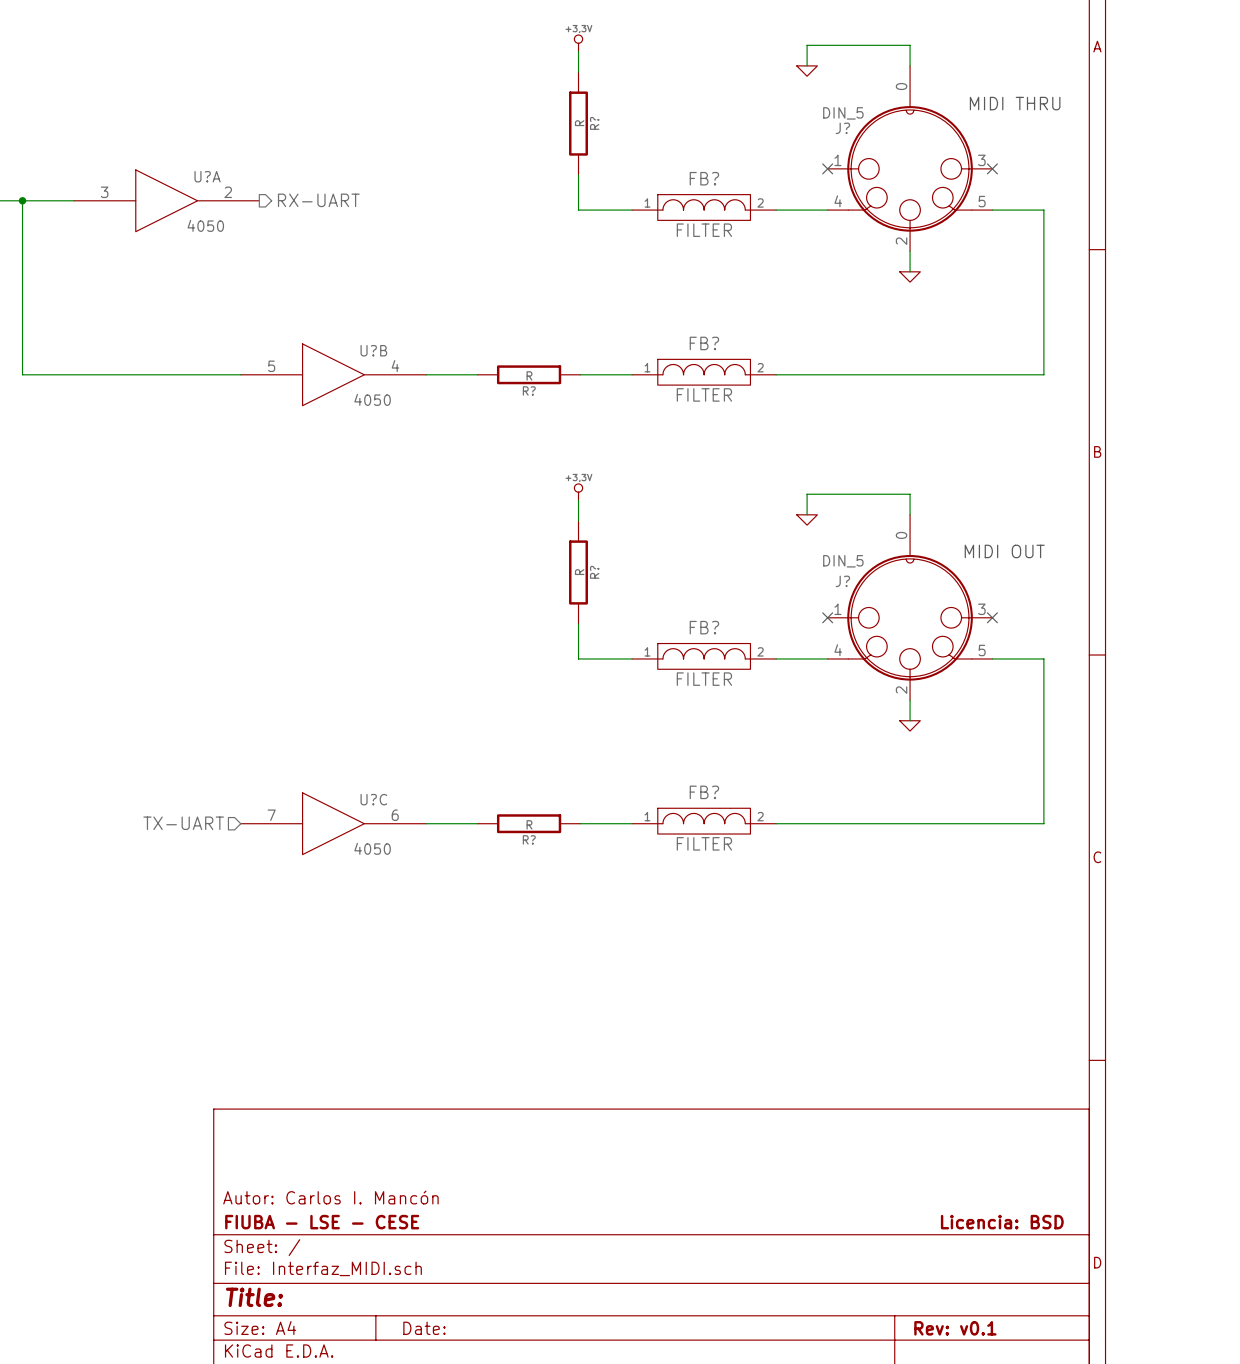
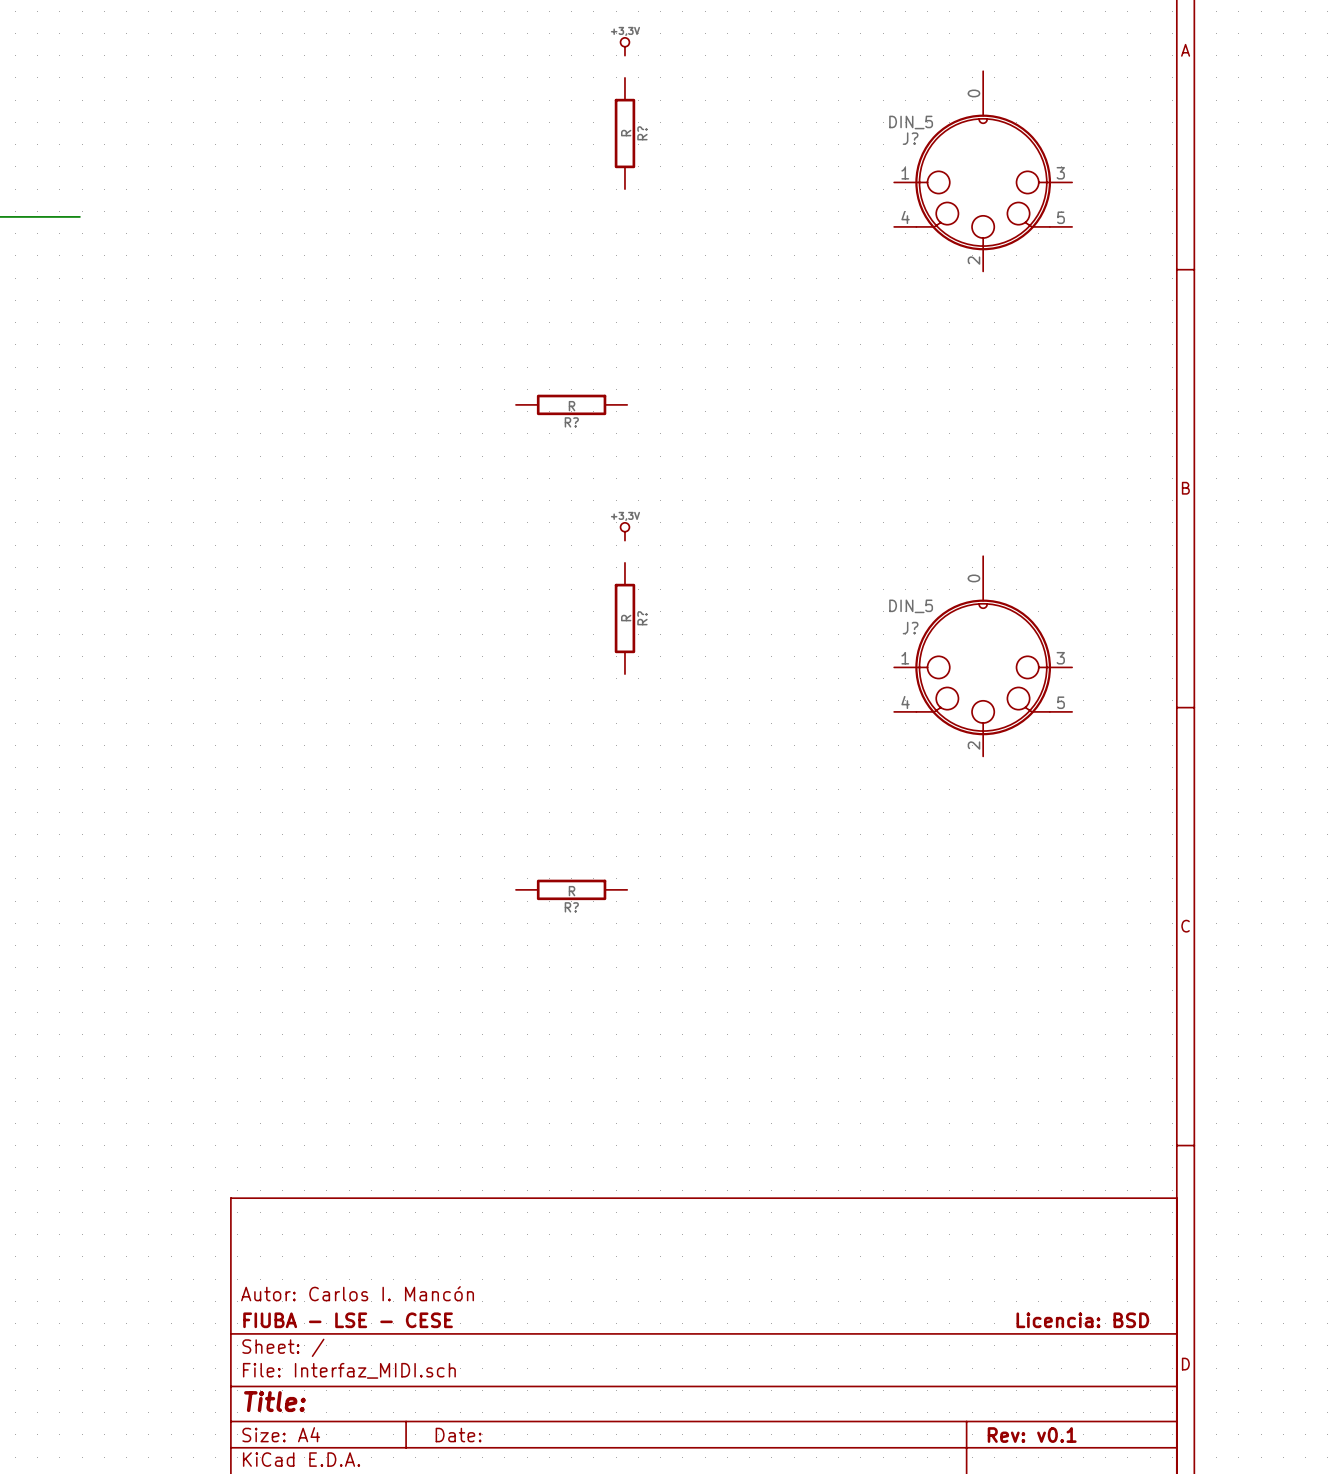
wire: (578, 51) (578, 72) -> none
wire: (807, 65) (807, 45) (910, 45) (910, 65) -> none
power symbol: (807, 71) -> none
text: MIDI THRU (1015, 103) -> none
no-connect mark: (827, 168) -> none
no-connect mark: (992, 168) -> none
wire: (578, 175) (578, 210) (632, 210) -> none
wire: (22, 200) (22, 374) (240, 374) -> none
junction: (22, 200) -> none
U?A: 4050 (166, 200) -> none
hierarchical label: RX-UART (318, 200) -> none
FB?: FILTER (704, 207) -> none
wire: (776, 210) (827, 210) -> none
wire: (992, 210) (1043, 210) (1043, 374) (776, 374) -> none
wire: (910, 251) (910, 271) -> none
power symbol: (910, 276) -> none
FB?: FILTER (704, 372) -> none
U?B: 4050 (333, 374) -> none
wire: (426, 374) (477, 374) -> none
wire: (580, 374) (632, 374) -> none
wire: (578, 500) (578, 521) -> none
wire: (807, 514) (807, 494) (910, 494) (910, 514) -> none
power symbol: (807, 519) -> none
text: MIDI OUT (1004, 551) -> none
no-connect mark: (827, 617) -> none
no-connect mark: (992, 617) -> none
wire: (578, 623) (578, 658) (632, 658) -> none
FB?: FILTER (704, 656) -> none
wire: (776, 658) (827, 658) -> none
wire: (992, 658) (1043, 658) (1043, 823) (776, 823) -> none
wire: (910, 700) (910, 720) -> none
power symbol: (910, 725) -> none
FB?: FILTER (704, 821) -> none
hierarchical label: TX-UART (183, 823) -> none
U?C: 4050 (333, 823) -> none
wire: (426, 823) (477, 823) -> none
wire: (580, 823) (632, 823) -> none

